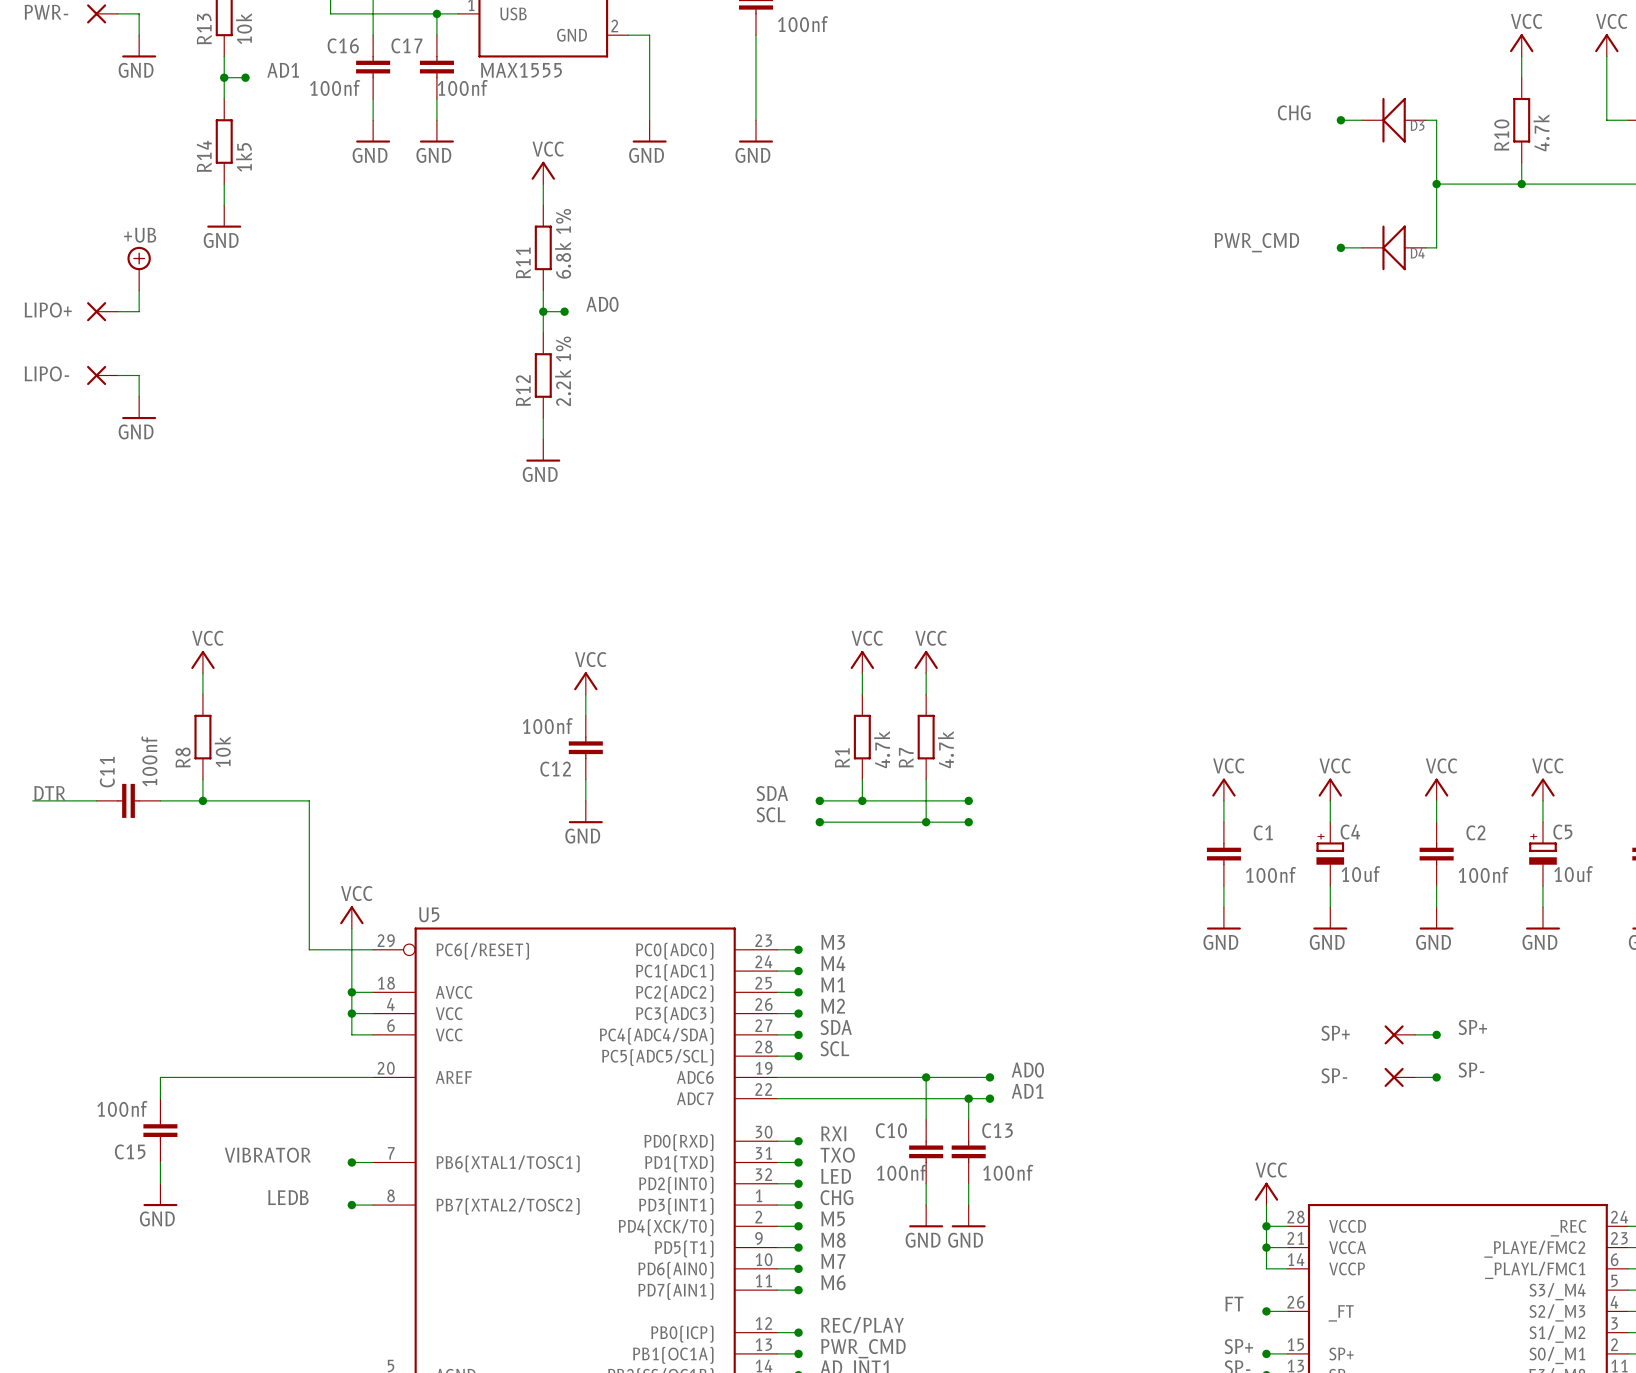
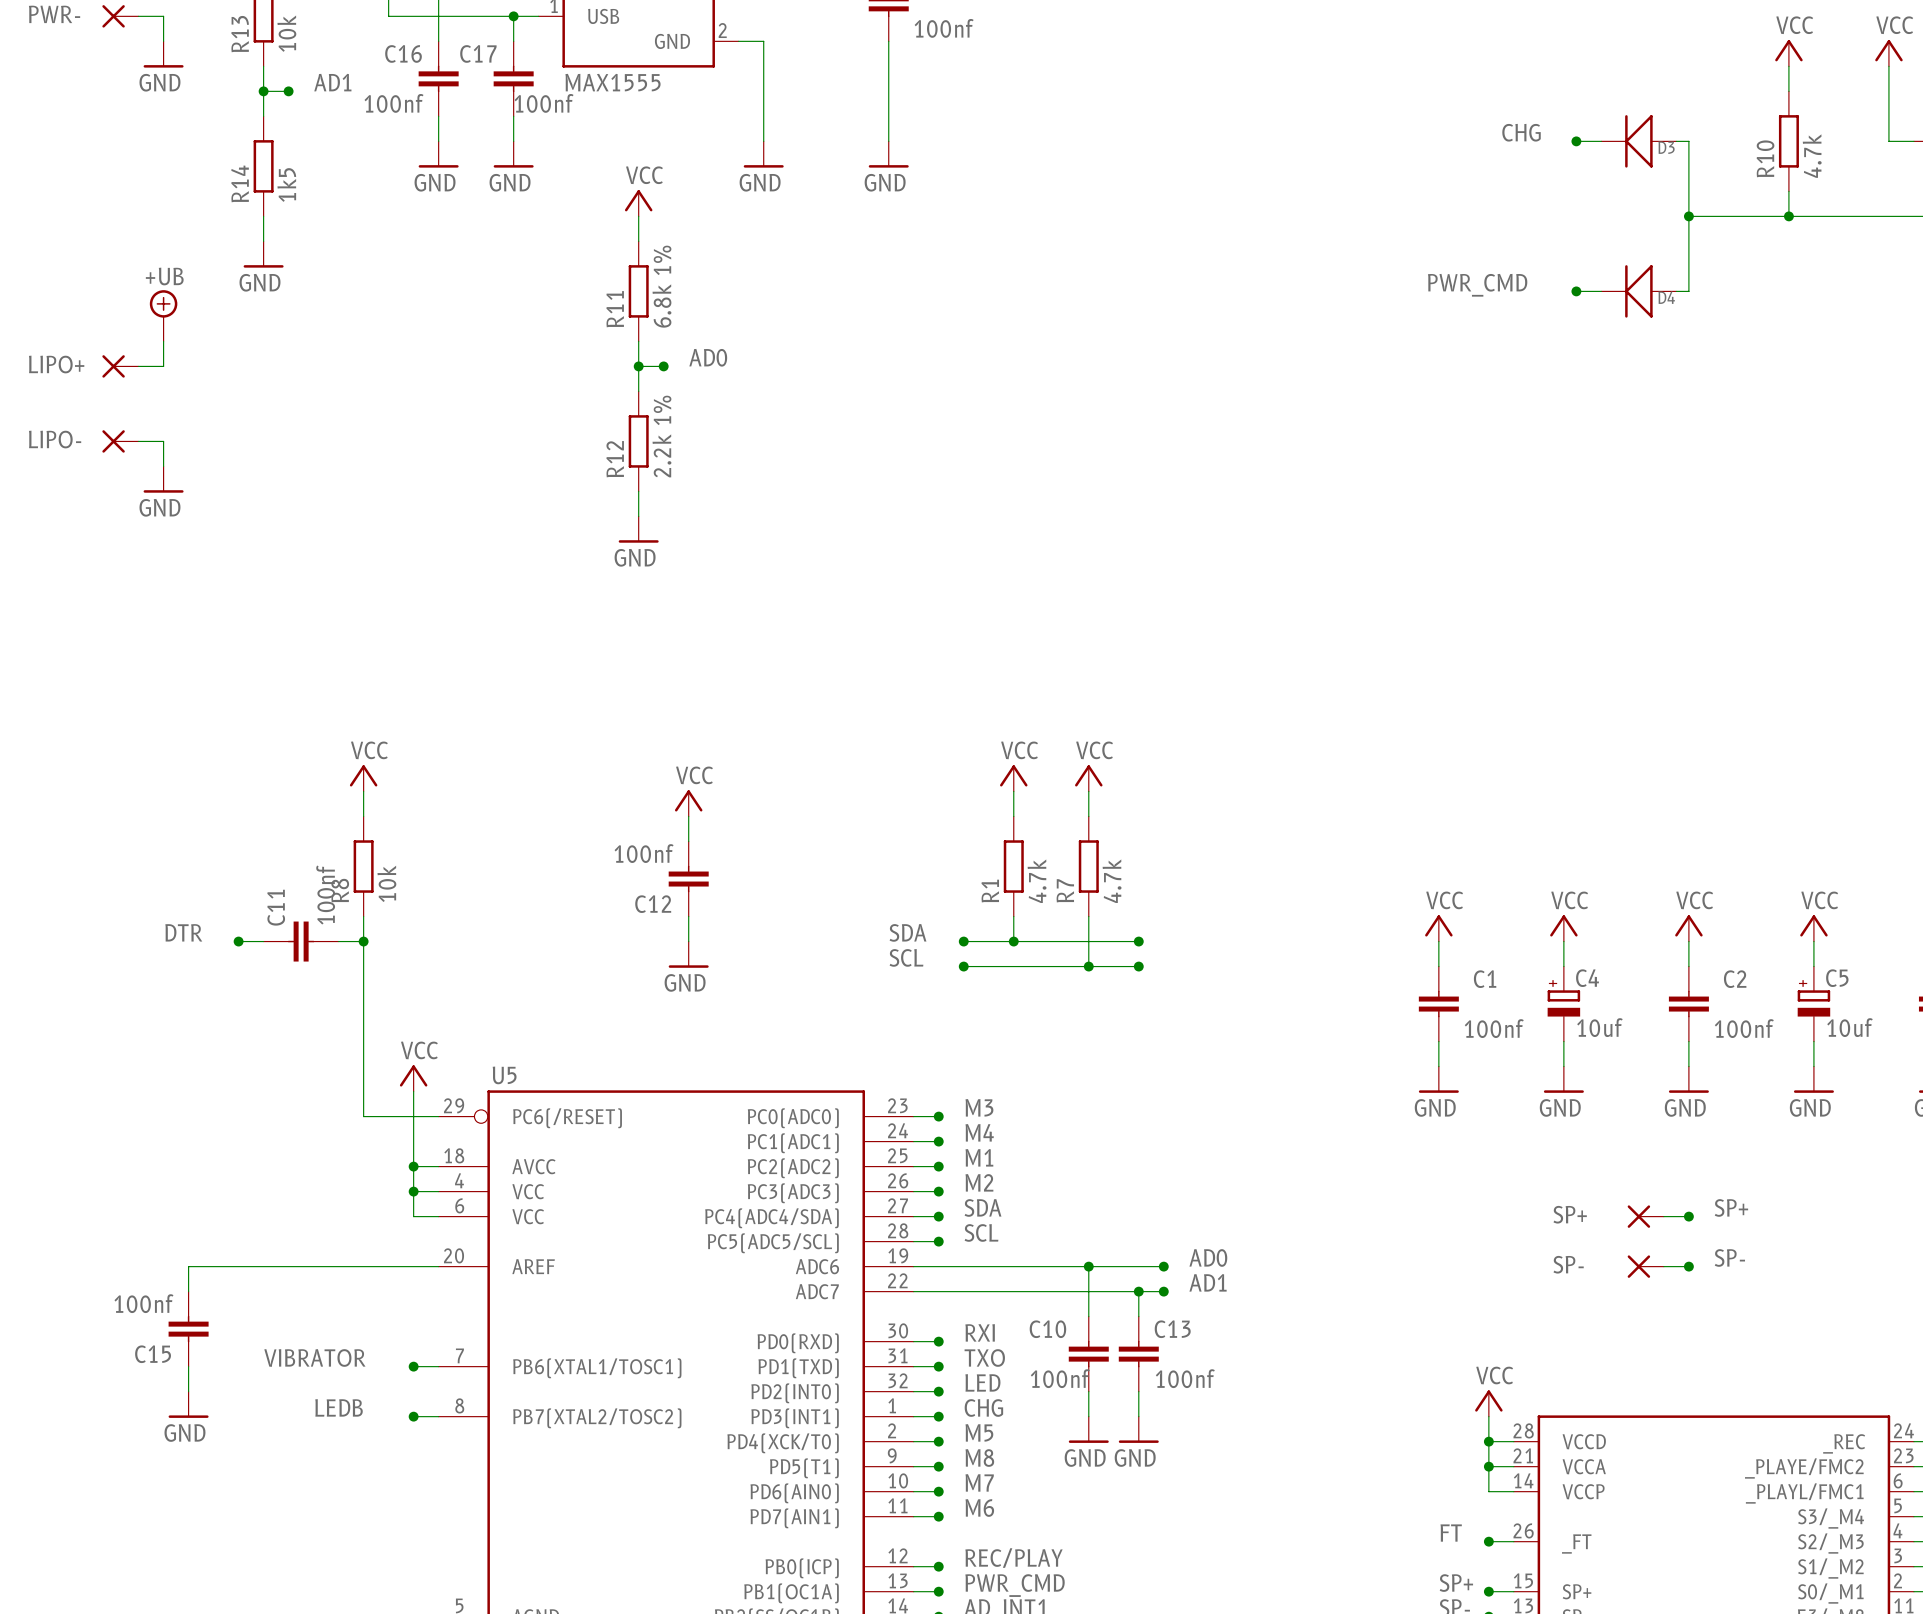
power symbol position: VCC (202, 662) -> VCC (363, 778)
wire: (202, 673) (202, 694) -> (363, 791) (363, 816)
R8 position: (202, 737) -> (363, 866)
wire: (202, 779) (202, 800) (160, 800) -> none
wire: none -> (363, 916) (363, 941)
label position: DTR (50, 793) -> DTR (183, 932)
wire: (32, 800) (96, 800) -> none
C11 position: (128, 800) -> (301, 941)
junction: none -> (363, 941)

